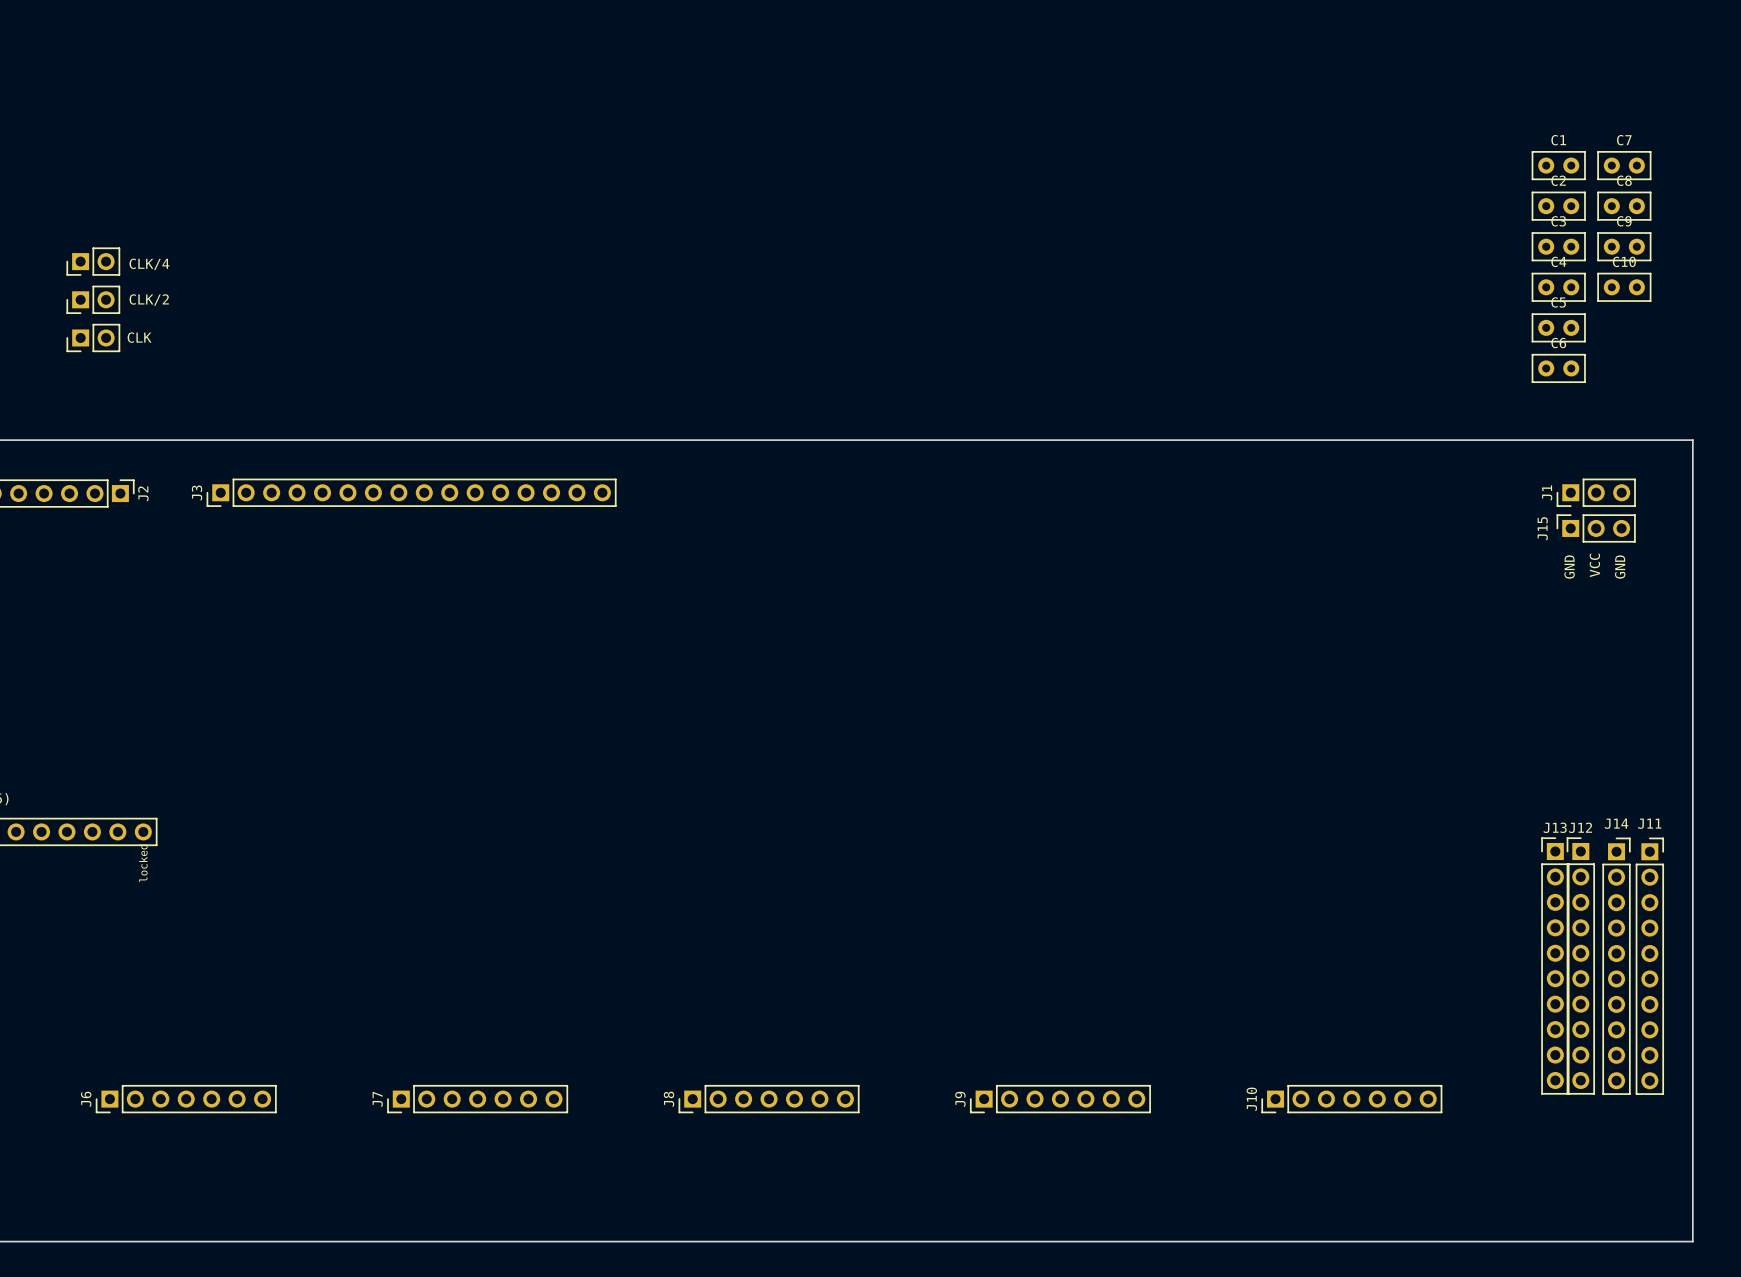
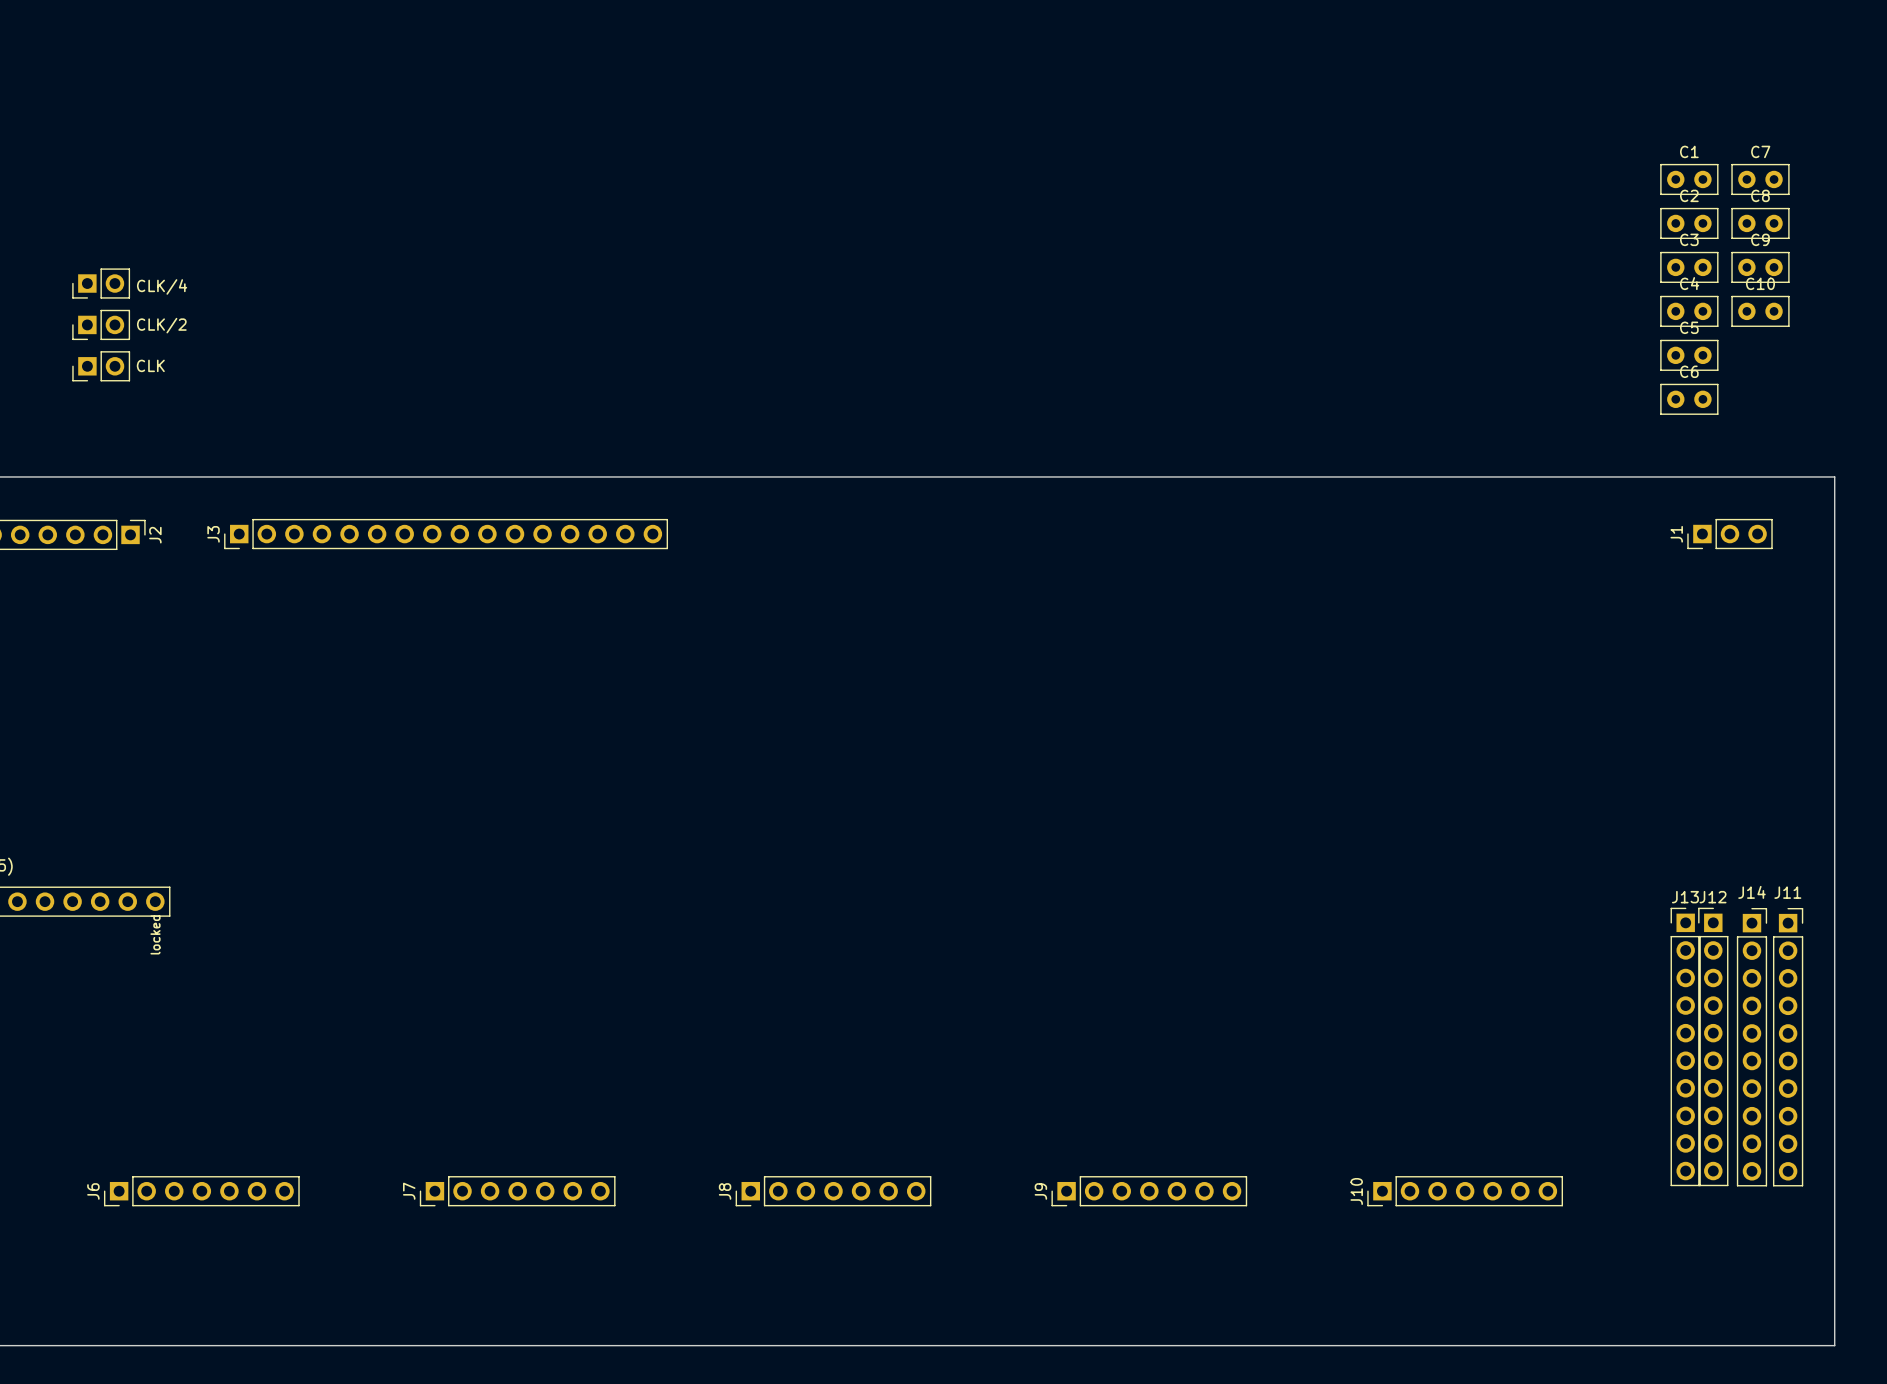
J15: (1596, 528) -> none
text: VCC (1594, 565) -> none
text: GND (1569, 567) -> none
text: GND (1620, 567) -> none

